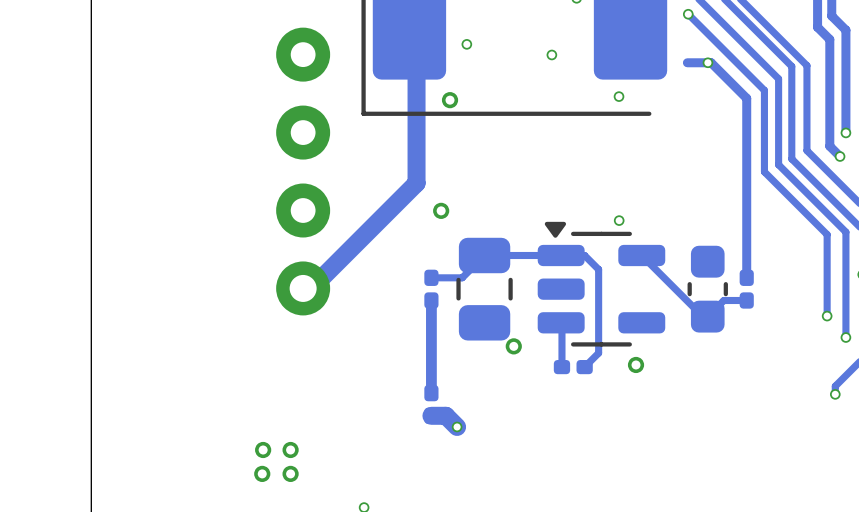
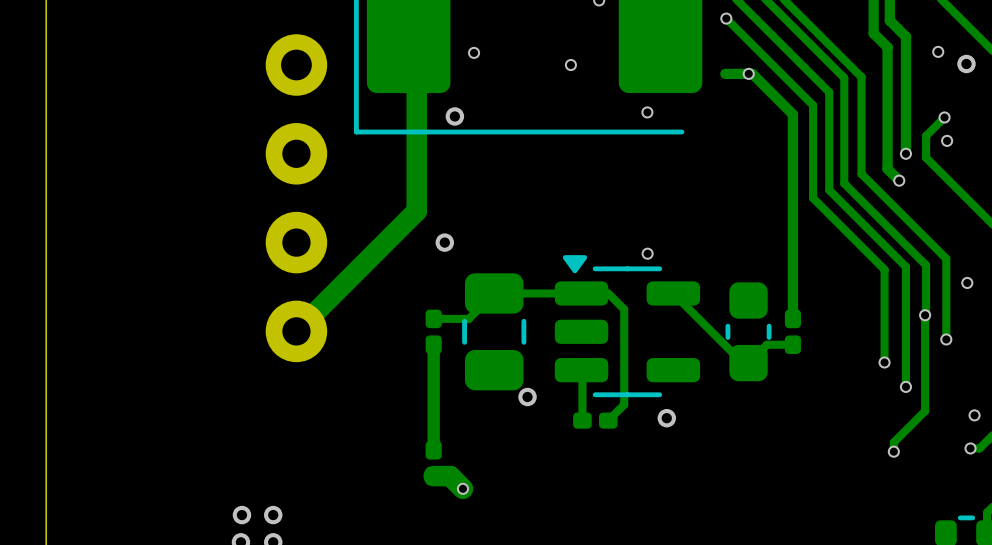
part rotation: 0° (303, 171) -> 180° (296, 198)

